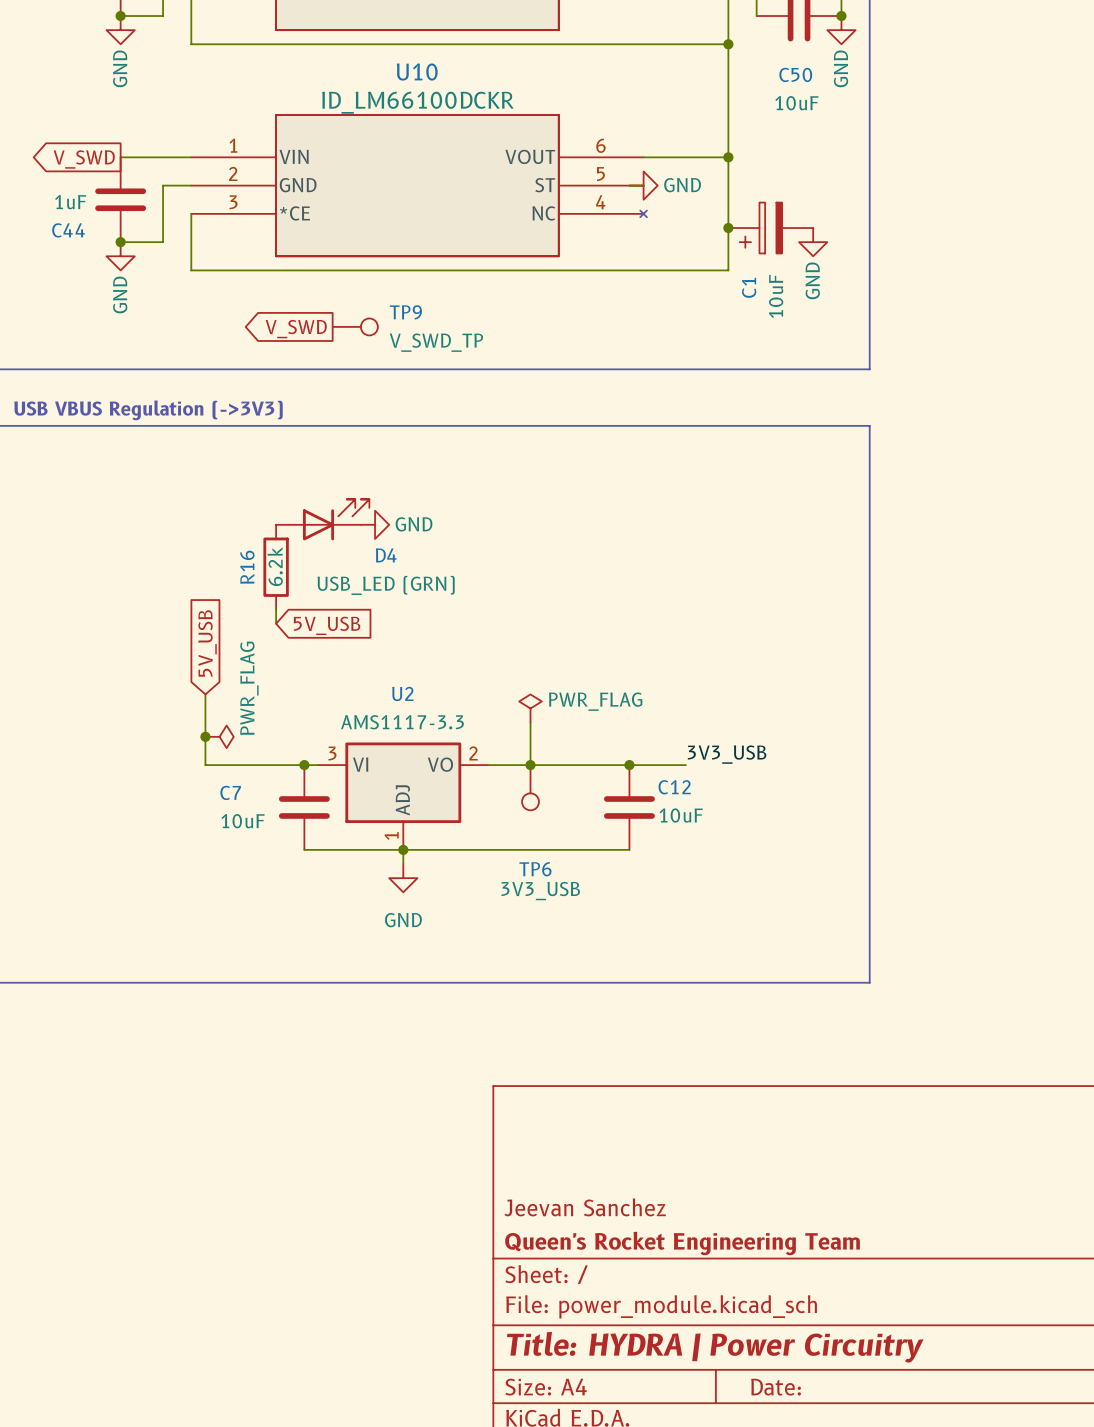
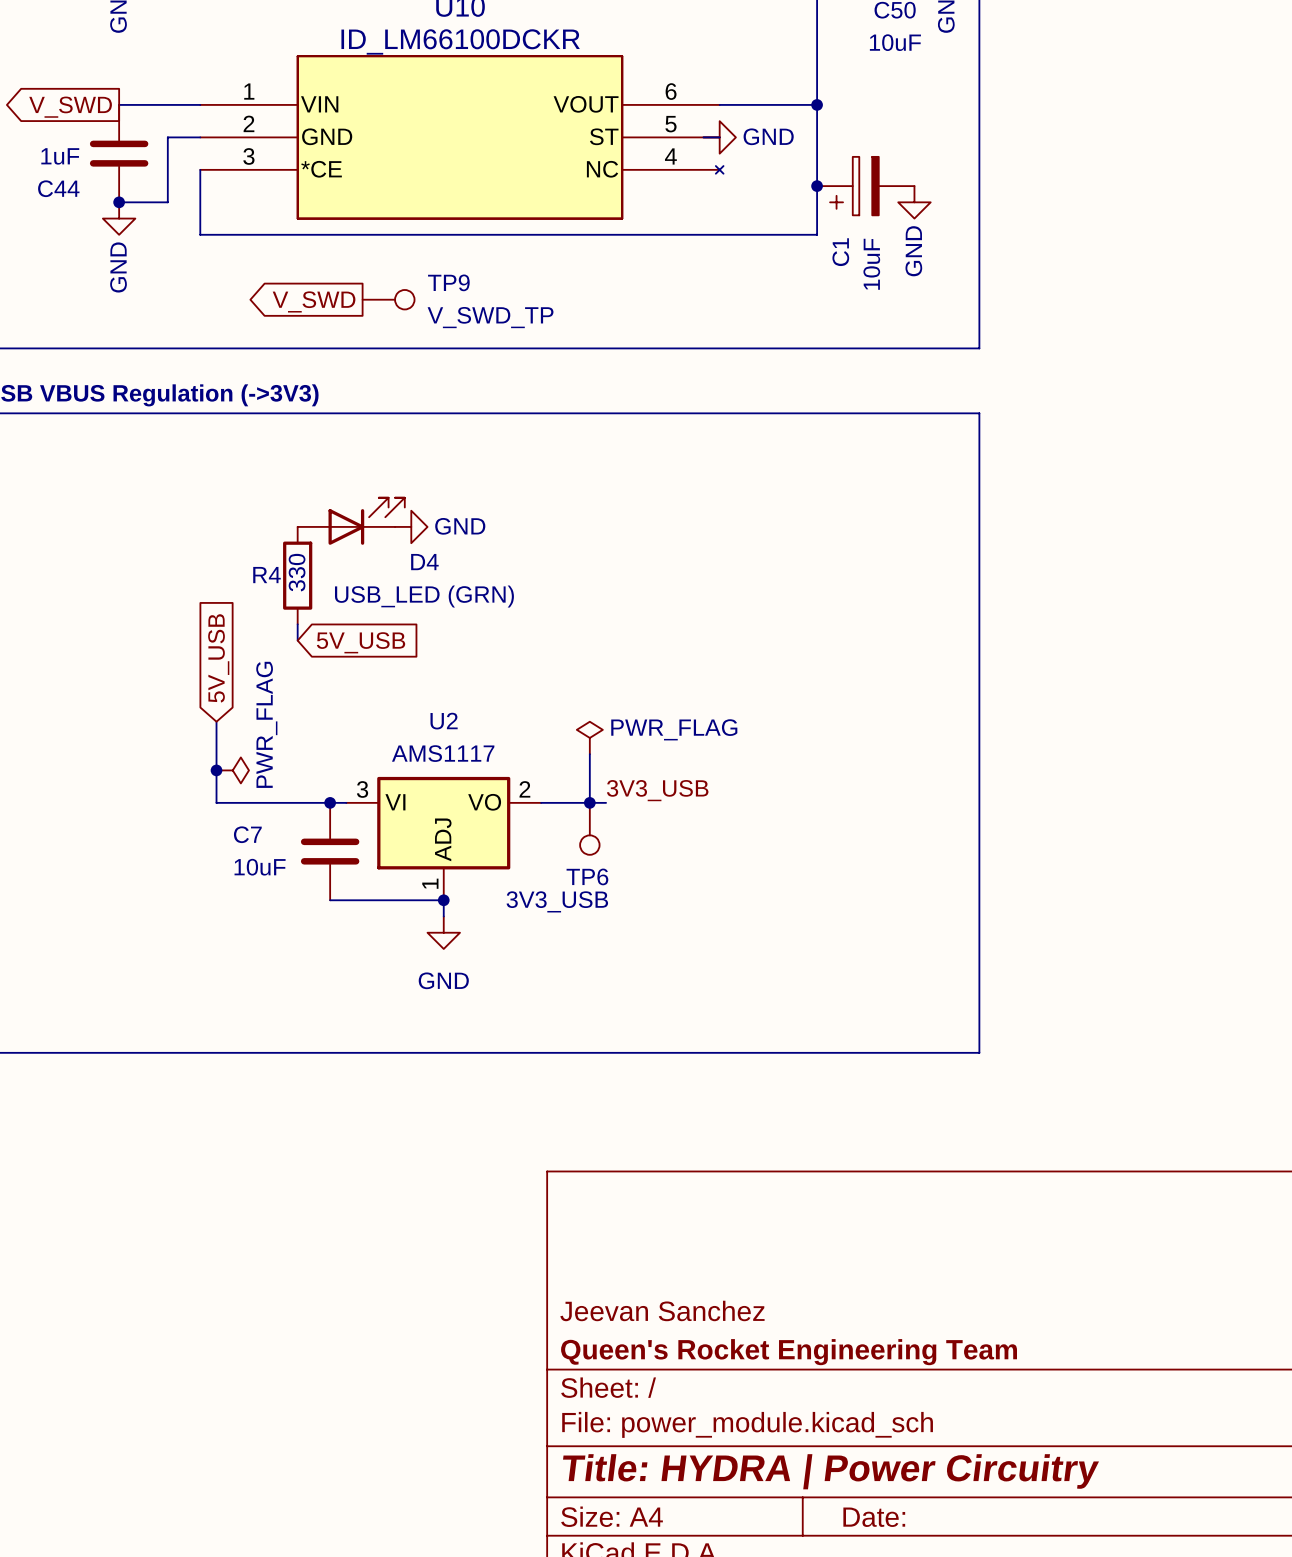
R16 value: 6.2k (275, 566) -> 330 (297, 572)
R16 name: R16 (247, 567) -> R4 (266, 575)
U2 value: AMS1117-3.3 (402, 722) -> AMS1117 (443, 753)
label position: 3V3_USB (727, 754) -> 3V3_USB (657, 790)
wire: (544, 765) (685, 765) -> none
junction: (629, 765) -> none
C12: 10uF (629, 807) -> none
wire: (403, 849) (629, 849) -> none
TP6 name position: TP6 (535, 869) -> TP6 (587, 876)
TP6 value position: 3V3_USB (540, 891) -> 3V3_USB (557, 901)

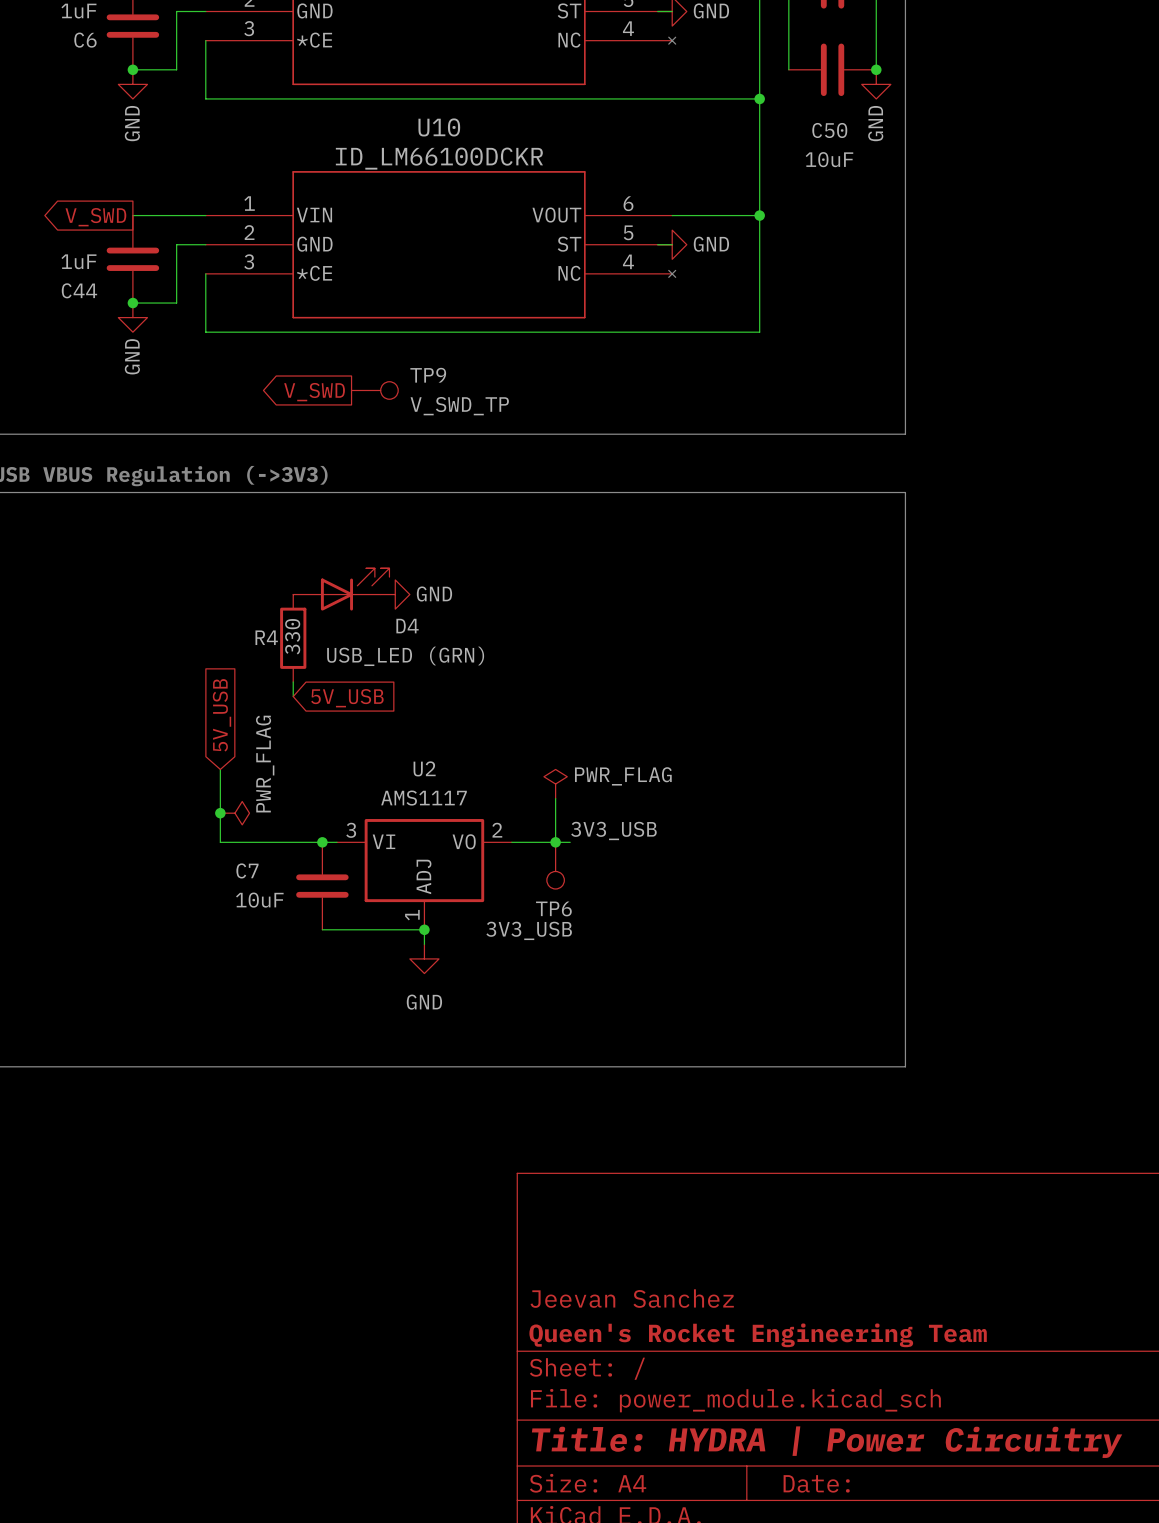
junction: (817, 186) -> none
C1: 10uF (865, 186) -> none
power symbol: GND (914, 202) -> none

